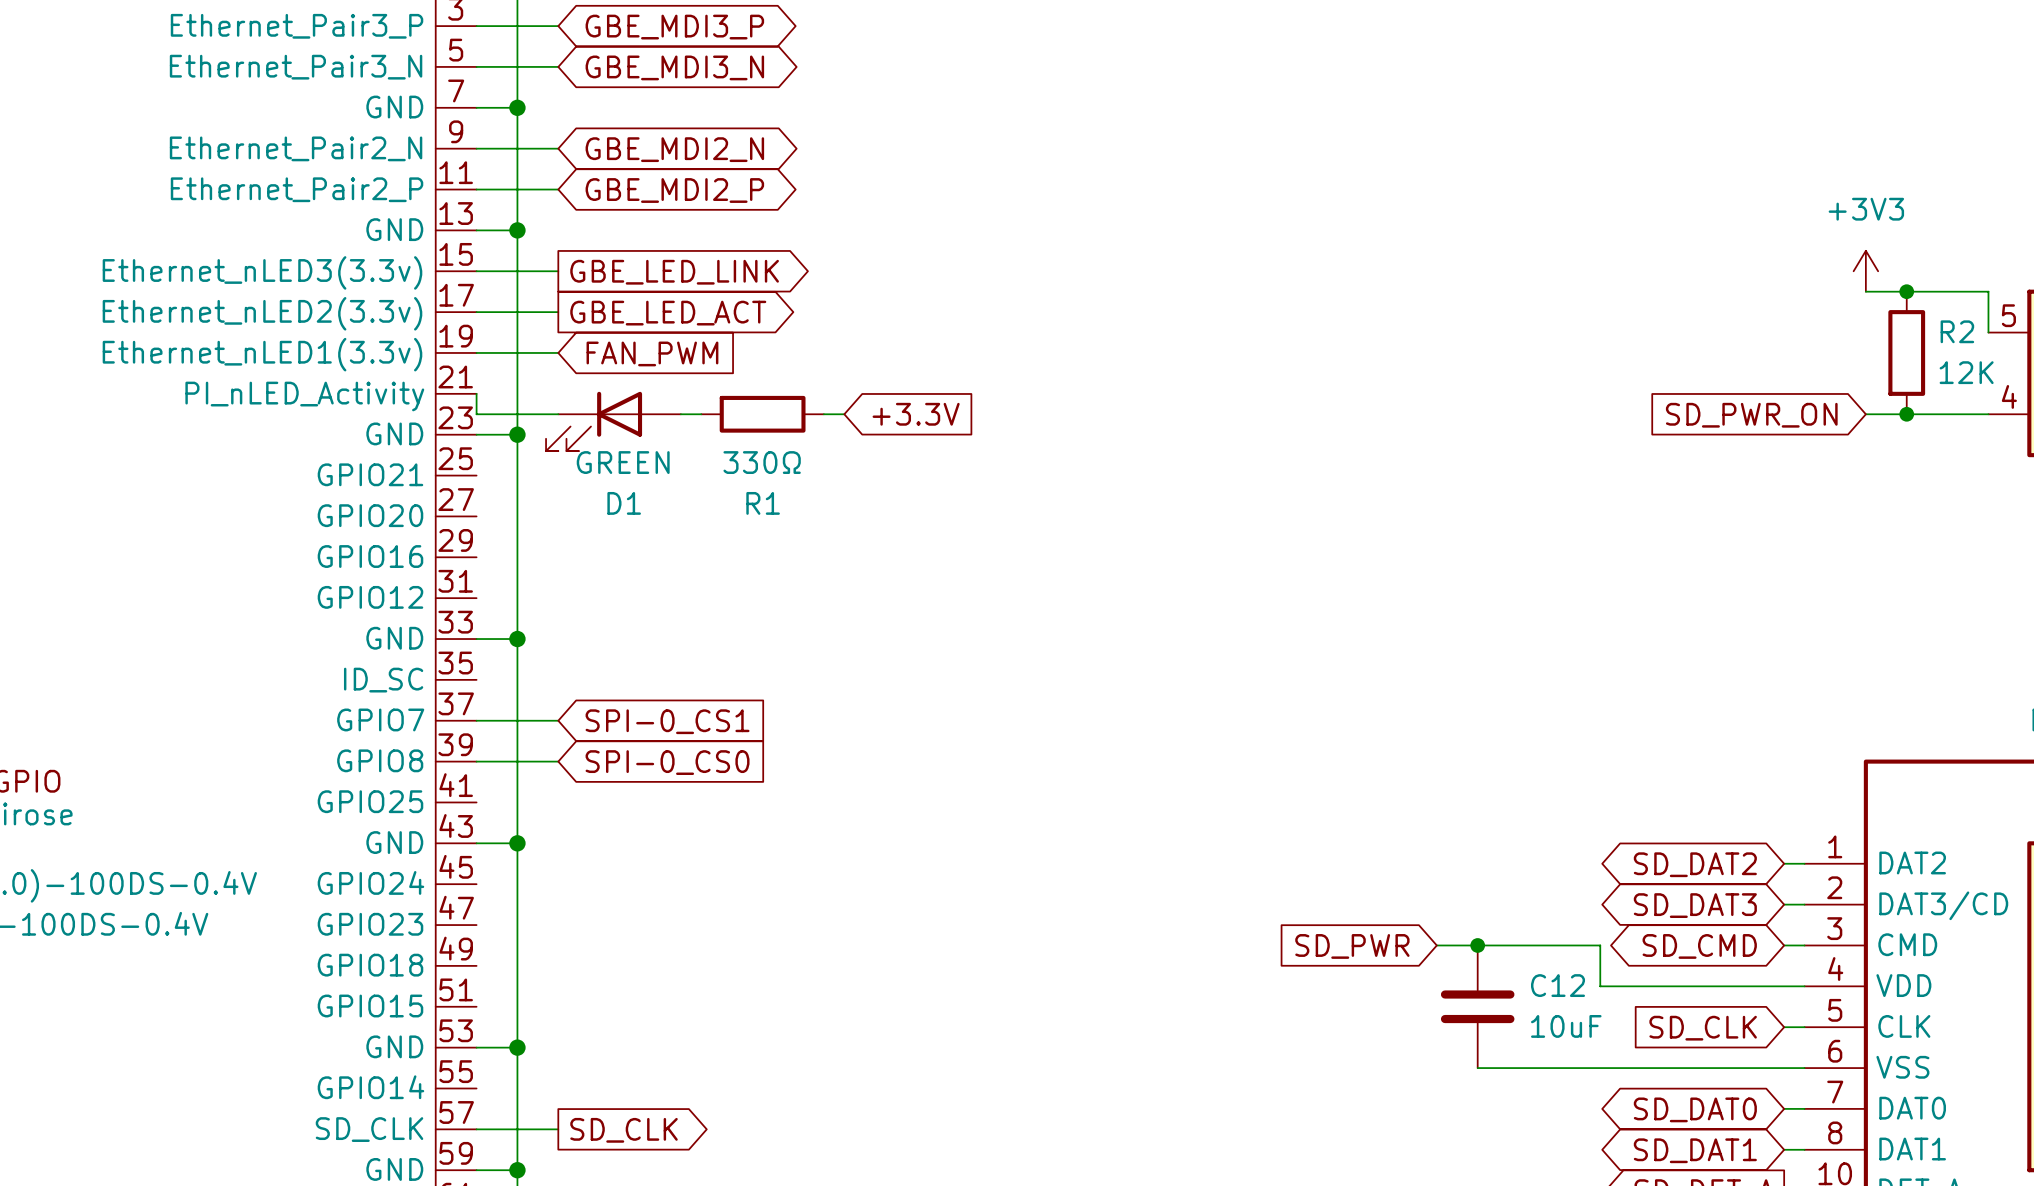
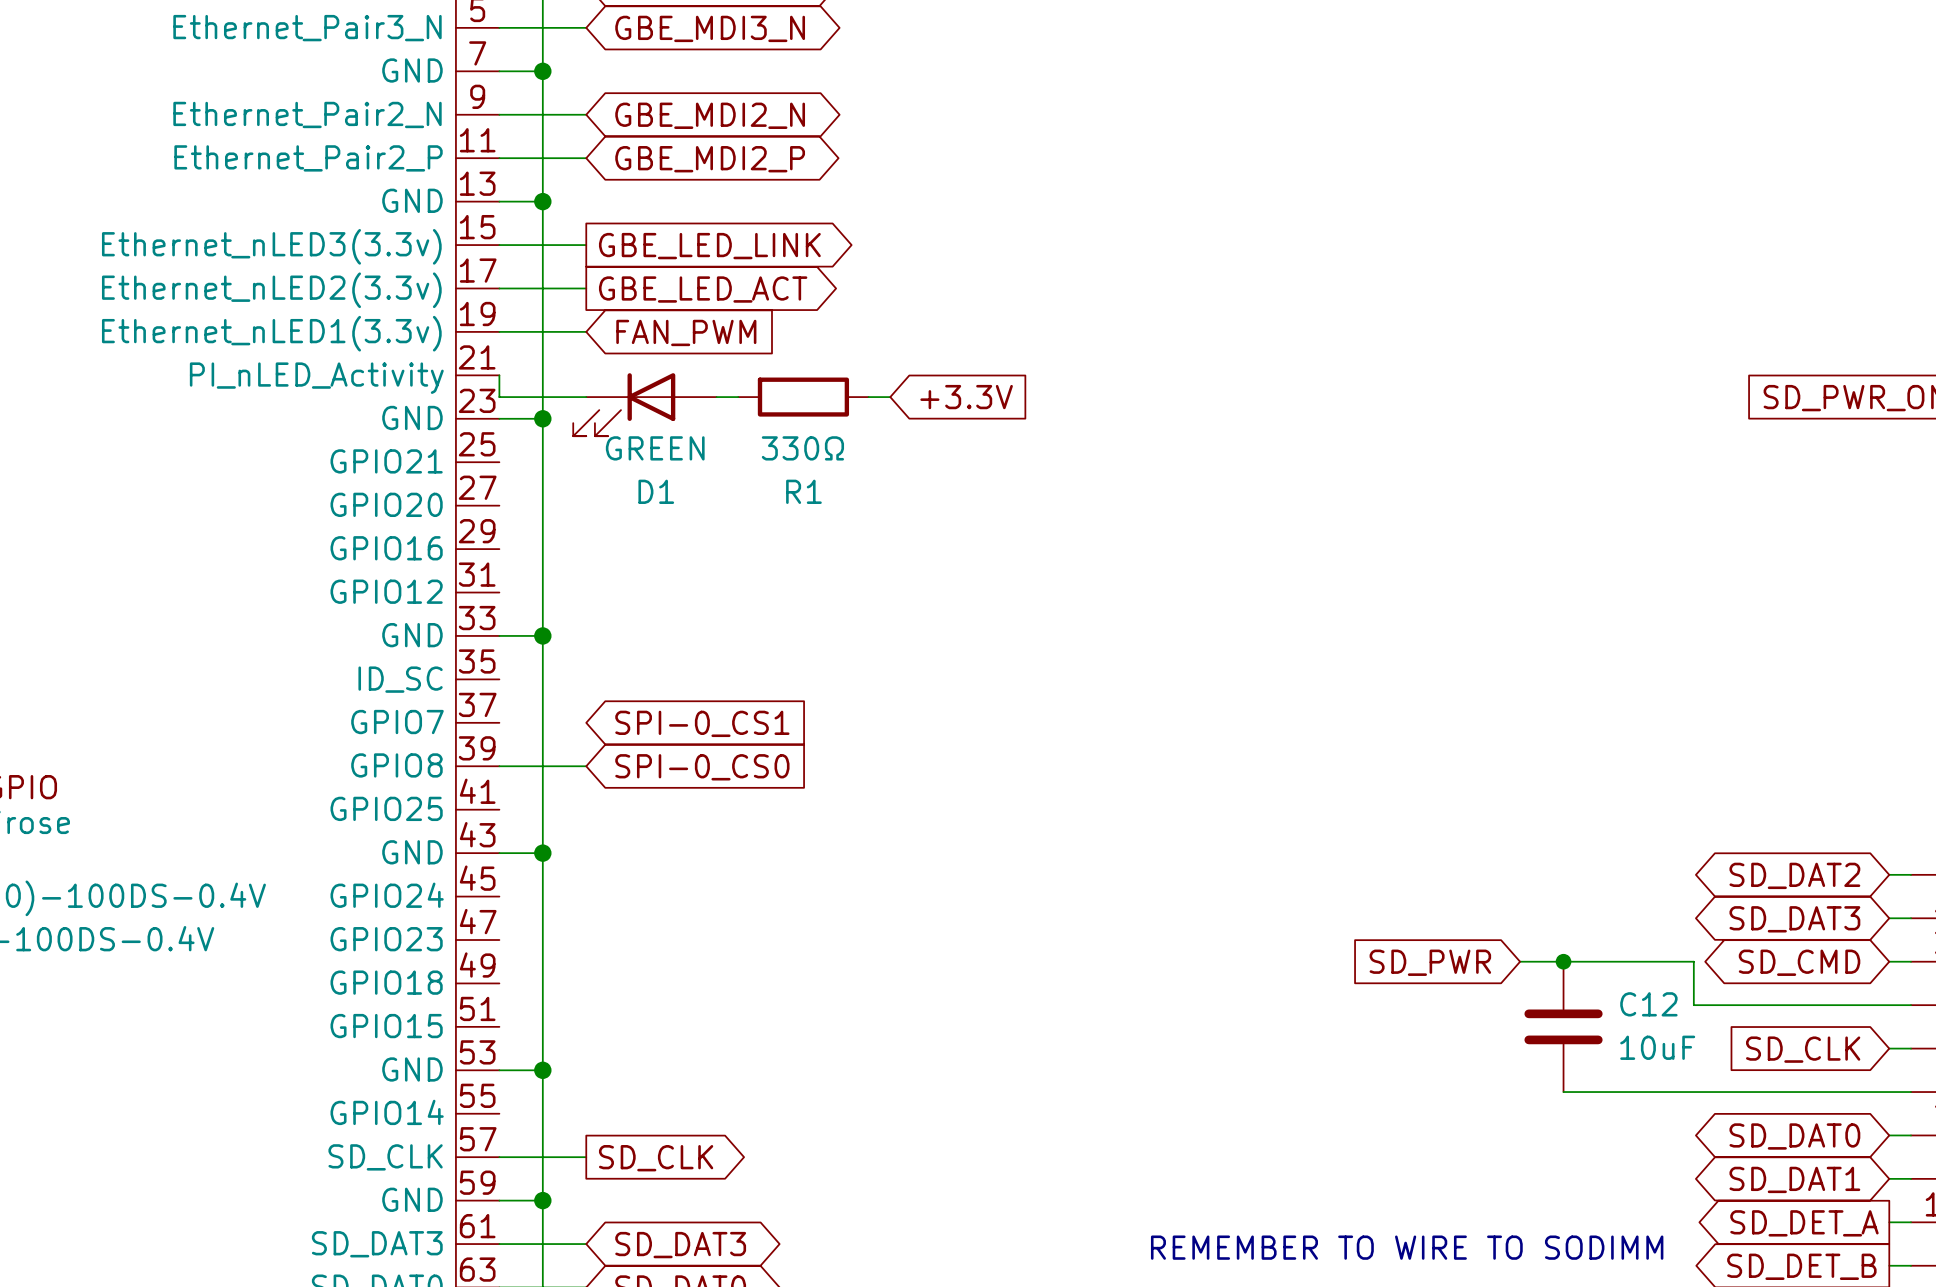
wire: (476, 720) (558, 720) -> none

